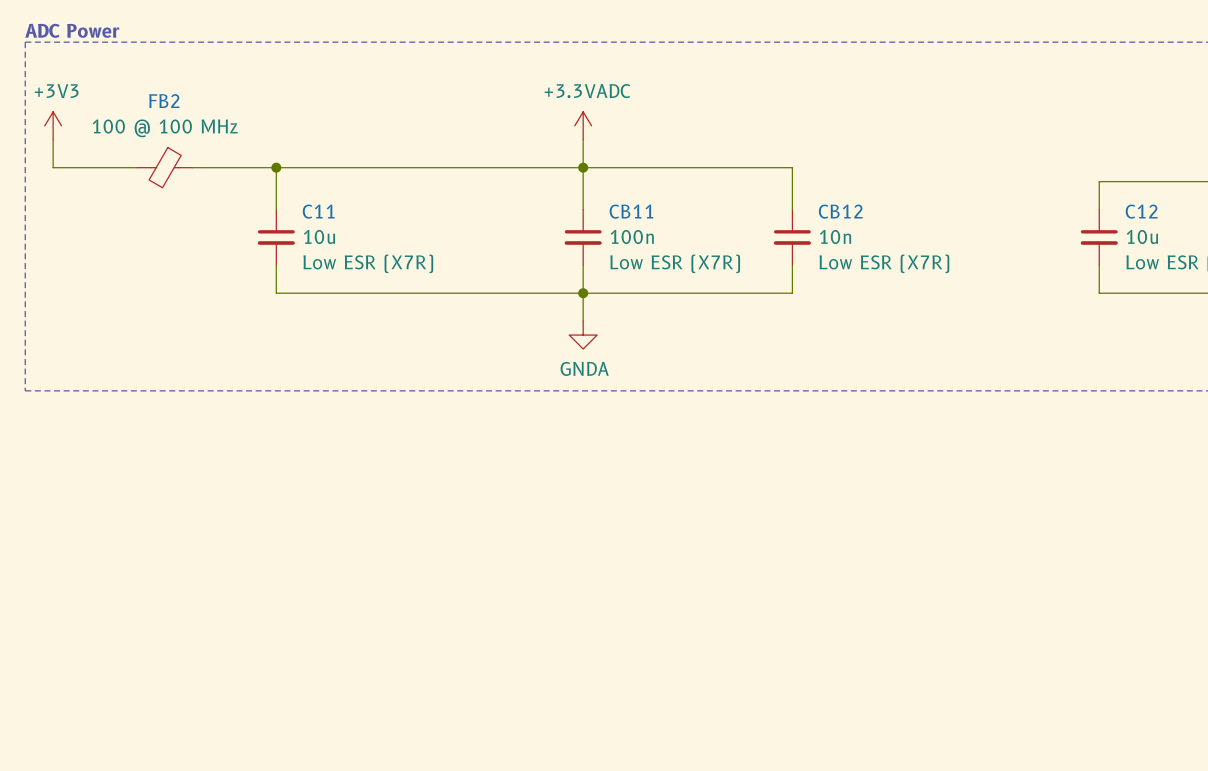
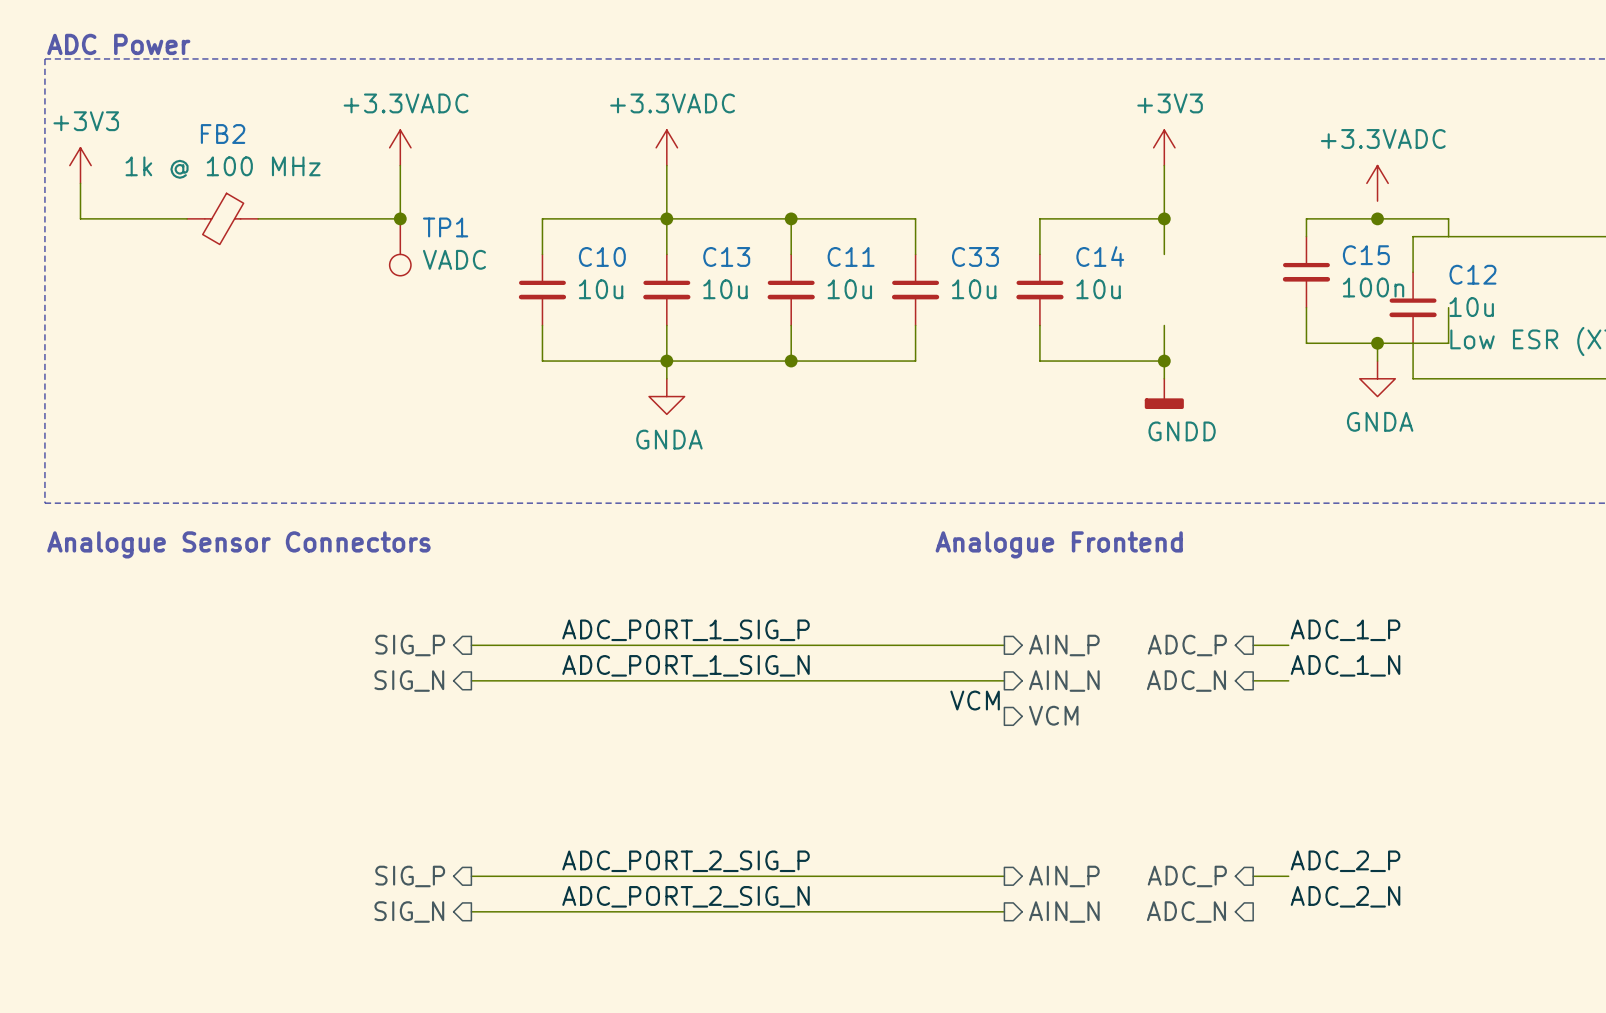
power symbol: none -> +3.3VADC (400, 147)
power symbol: none -> +3V3 (1164, 147)
power symbol position: +3.3VADC (583, 125) -> +3.3VADC (666, 147)
wire: none -> (1164, 165) (1164, 254)
FB2 text: 100 @ 100 MHz (165, 128) -> 1k @ 100 MHz (223, 167)
wire: (583, 139) (583, 209) -> (666, 165) (666, 254)
power symbol: none -> +3.3VADC (1377, 183)
wire: (276, 167) (276, 209) -> (400, 165) (400, 218)
junction position: (276, 167) -> (400, 218)
wire: (304, 167) (415, 167) -> (542, 254) (542, 218)
junction: none -> (666, 218)
junction position: (583, 167) -> (791, 218)
wire: none -> (791, 218) (791, 254)
wire: (708, 167) (792, 167) (792, 209) -> (915, 218) (915, 254)
wire: none -> (1164, 218) (1039, 218) (1039, 254)
junction: none -> (1164, 218)
junction: none -> (1377, 218)
wire: none -> (1306, 236) (1306, 218) (1448, 218) (1448, 236)
TP1: none -> VADC (400, 247)
C15: none -> 100n (1306, 272)
C10: none -> 10u (542, 289)
C13: none -> 10u (666, 289)
C33: none -> 10u (915, 289)
C14: none -> 10u (1039, 289)
C11 position: (276, 237) -> (791, 289)
CB11: 100n (583, 237) -> none
CB12: 10n (792, 237) -> none
wire: none -> (1306, 307) (1306, 343) (1448, 343) (1448, 307)
wire: none -> (542, 325) (542, 361) (915, 361) (915, 325)
wire: none -> (666, 325) (666, 378)
wire: none -> (791, 325) (791, 361)
wire: none -> (1039, 325) (1039, 361) (1164, 361)
wire: none -> (1164, 325) (1164, 378)
C11 text: Low ESR (X7R) (368, 263) -> none
wire: (276, 265) (276, 293) (792, 293) (792, 265) -> none
wire: (583, 265) (583, 321) -> none
wire: none -> (1377, 343) (1377, 361)
junction: none -> (1377, 343)
junction: none -> (666, 361)
junction: none -> (1164, 361)
junction position: (583, 293) -> (791, 361)
power symbol: none -> GNDA (1377, 378)
power symbol: none -> GNDD (1164, 393)
power symbol position: GNDA (583, 335) -> GNDA (666, 396)
text: none -> Analogue Sensor Connectors (238, 544)
text: none -> Analogue Frontend (1059, 544)
label: none -> ADC_PORT_1_SIG_P (686, 630)
label: none -> ADC_1_P (1345, 630)
wire: none -> (471, 645) (1004, 645)
wire: none -> (1253, 645) (1288, 645)
sheet pin: none -> SIG_P (410, 645)
sheet pin: none -> AIN_P (1064, 645)
sheet pin: none -> ADC_P (1187, 645)
label: none -> ADC_PORT_1_SIG_N (686, 665)
label: none -> ADC_1_N (1345, 665)
wire: none -> (471, 680) (1004, 680)
wire: none -> (1253, 680) (1288, 680)
sheet pin: none -> SIG_N (409, 681)
sheet pin: none -> AIN_N (1064, 681)
sheet pin: none -> ADC_N (1186, 681)
label: none -> VCM (975, 700)
sheet pin: none -> VCM (1053, 715)
label: none -> ADC_PORT_2_SIG_P (686, 861)
label: none -> ADC_2_P (1345, 861)
wire: none -> (471, 876) (1004, 876)
wire: none -> (1253, 876) (1288, 876)
sheet pin: none -> SIG_P (410, 876)
sheet pin: none -> AIN_P (1064, 876)
sheet pin: none -> ADC_P (1187, 876)
label: none -> ADC_PORT_2_SIG_N (686, 896)
label: none -> ADC_2_N (1345, 896)
wire: none -> (471, 911) (1004, 911)
sheet pin: none -> SIG_N (409, 912)
sheet pin: none -> AIN_N (1064, 912)
sheet pin: none -> ADC_N (1186, 912)

